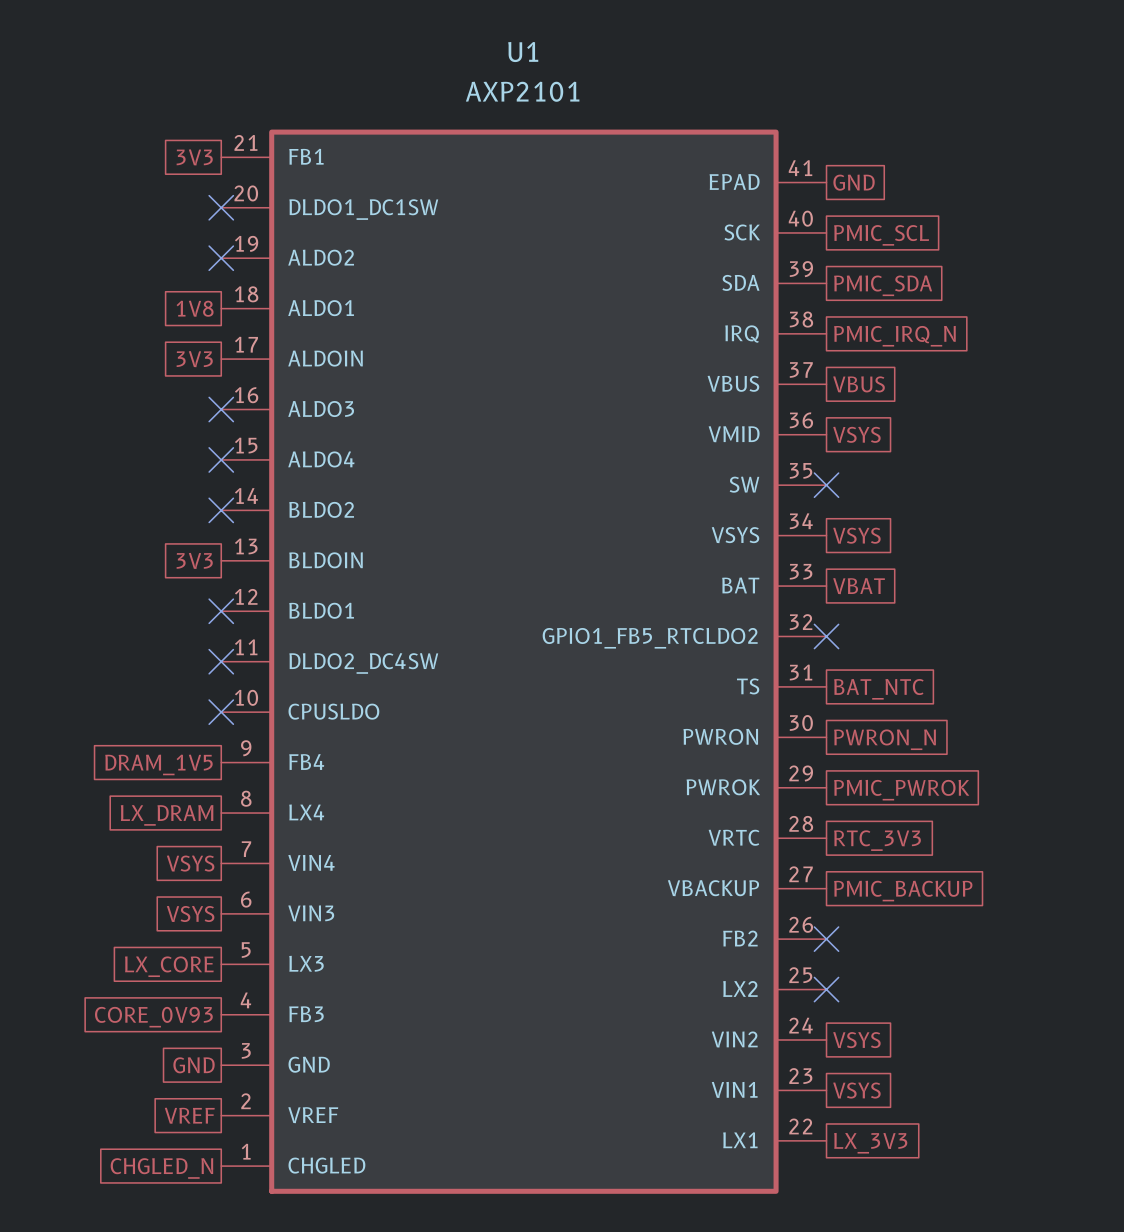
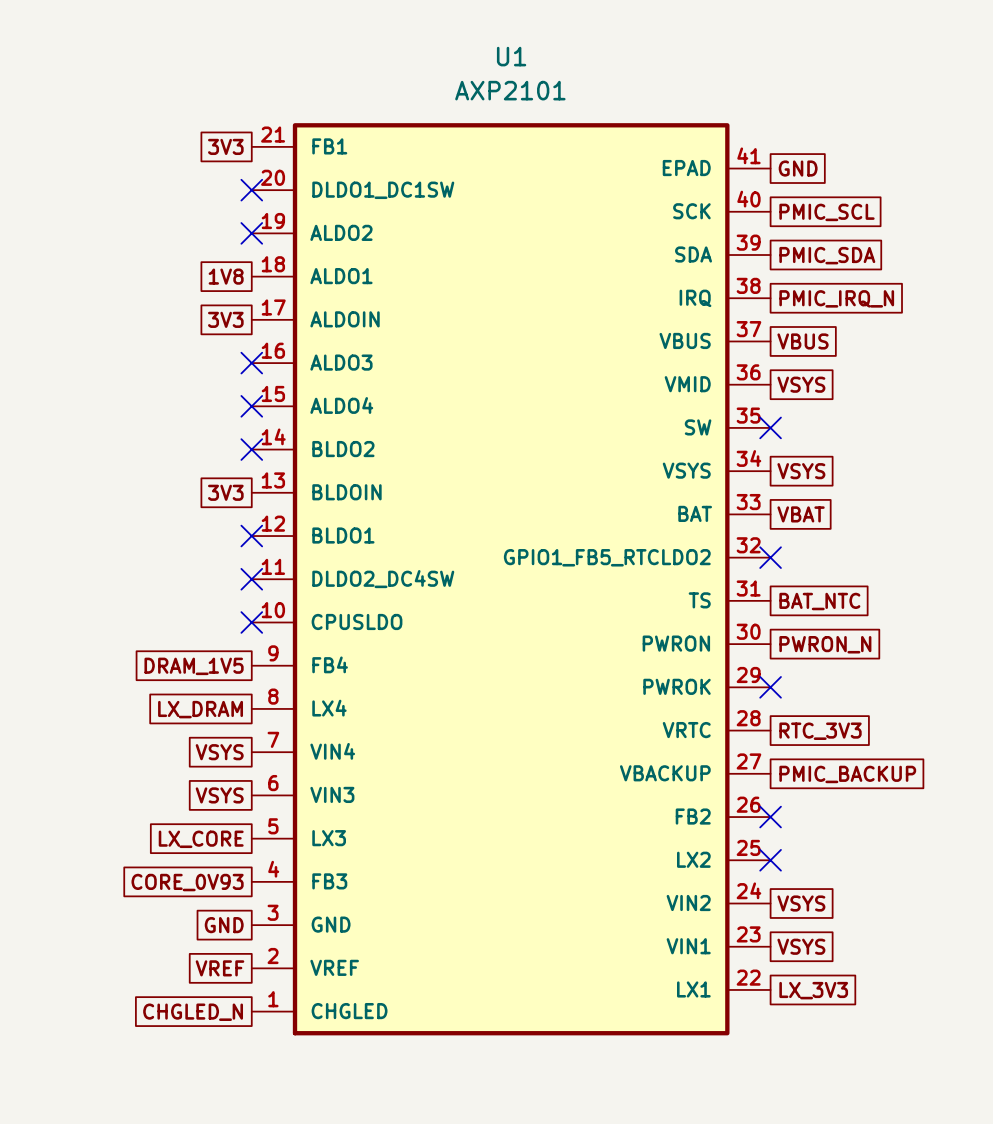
no-connect mark: none -> (770, 687)
global label: PMIC_PWROK (901, 790) -> none

